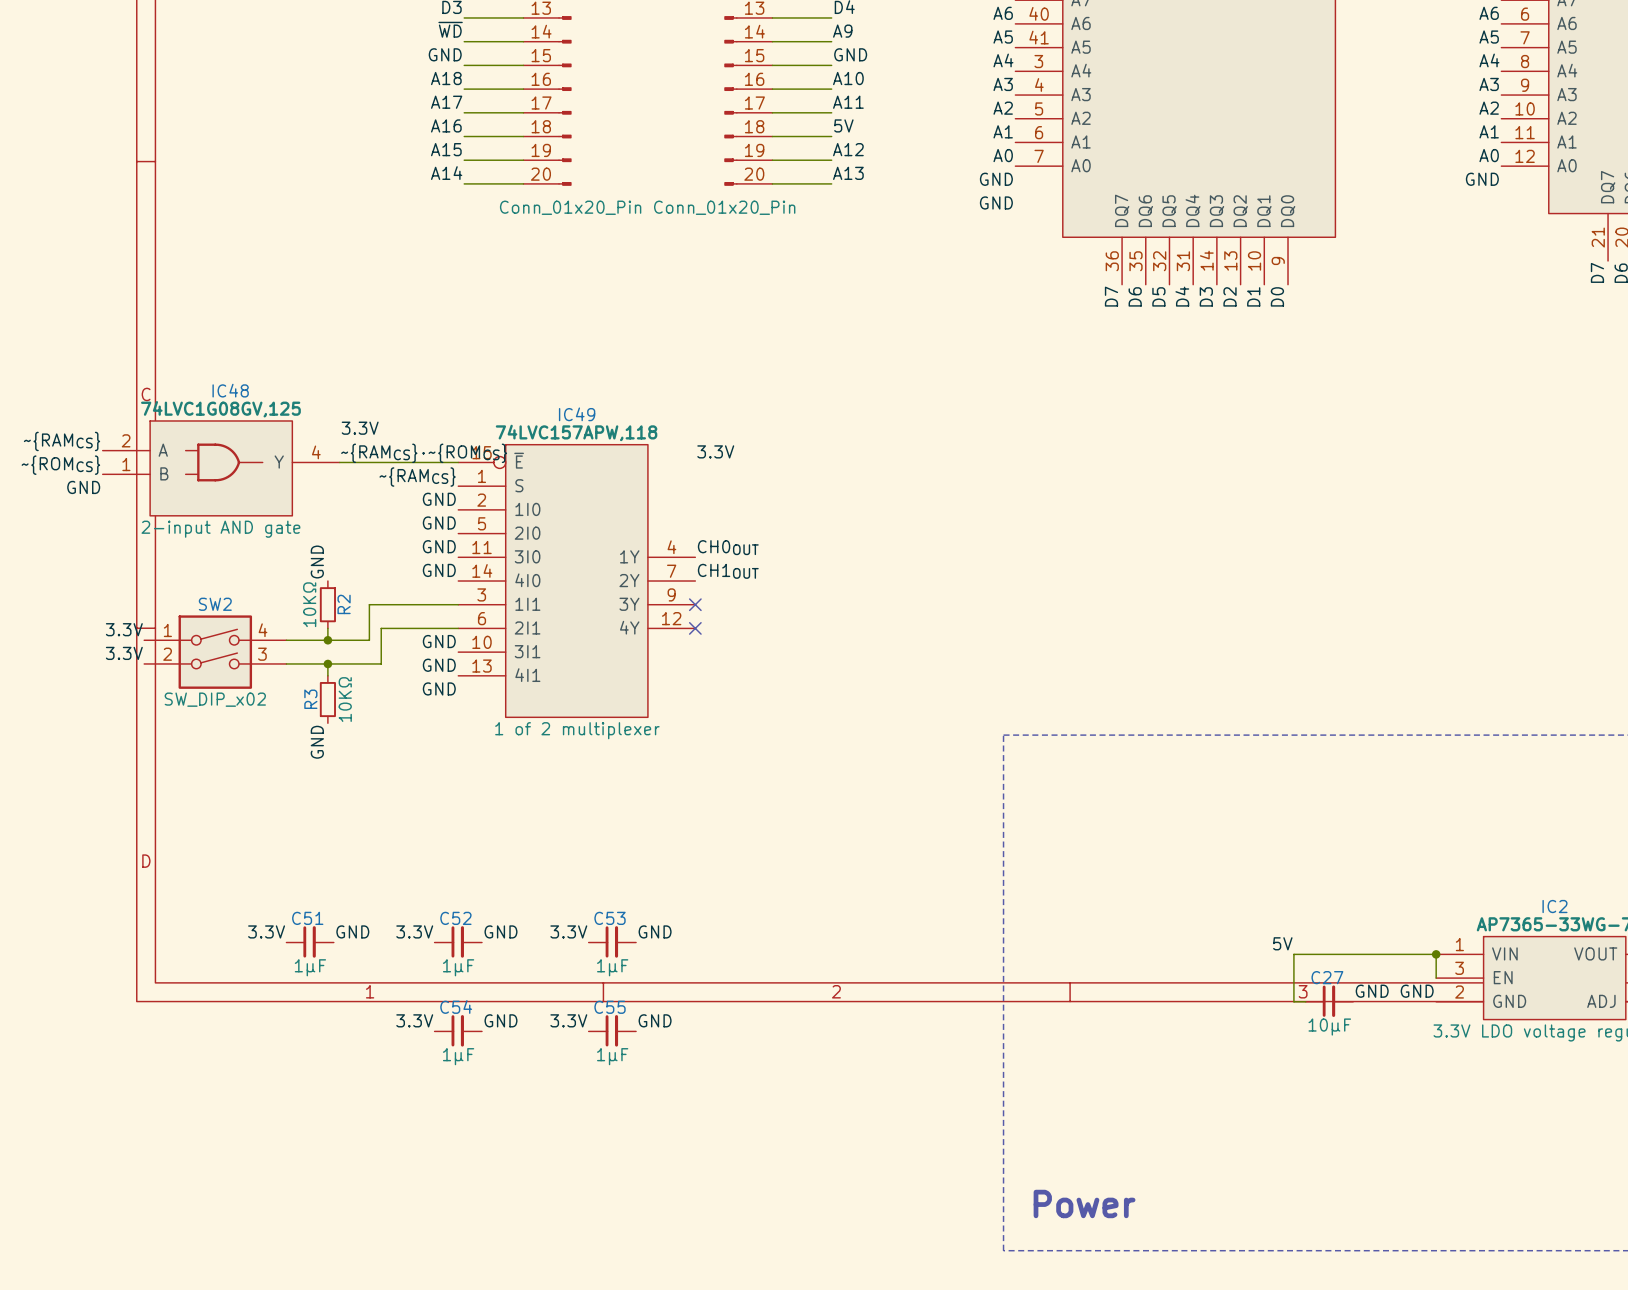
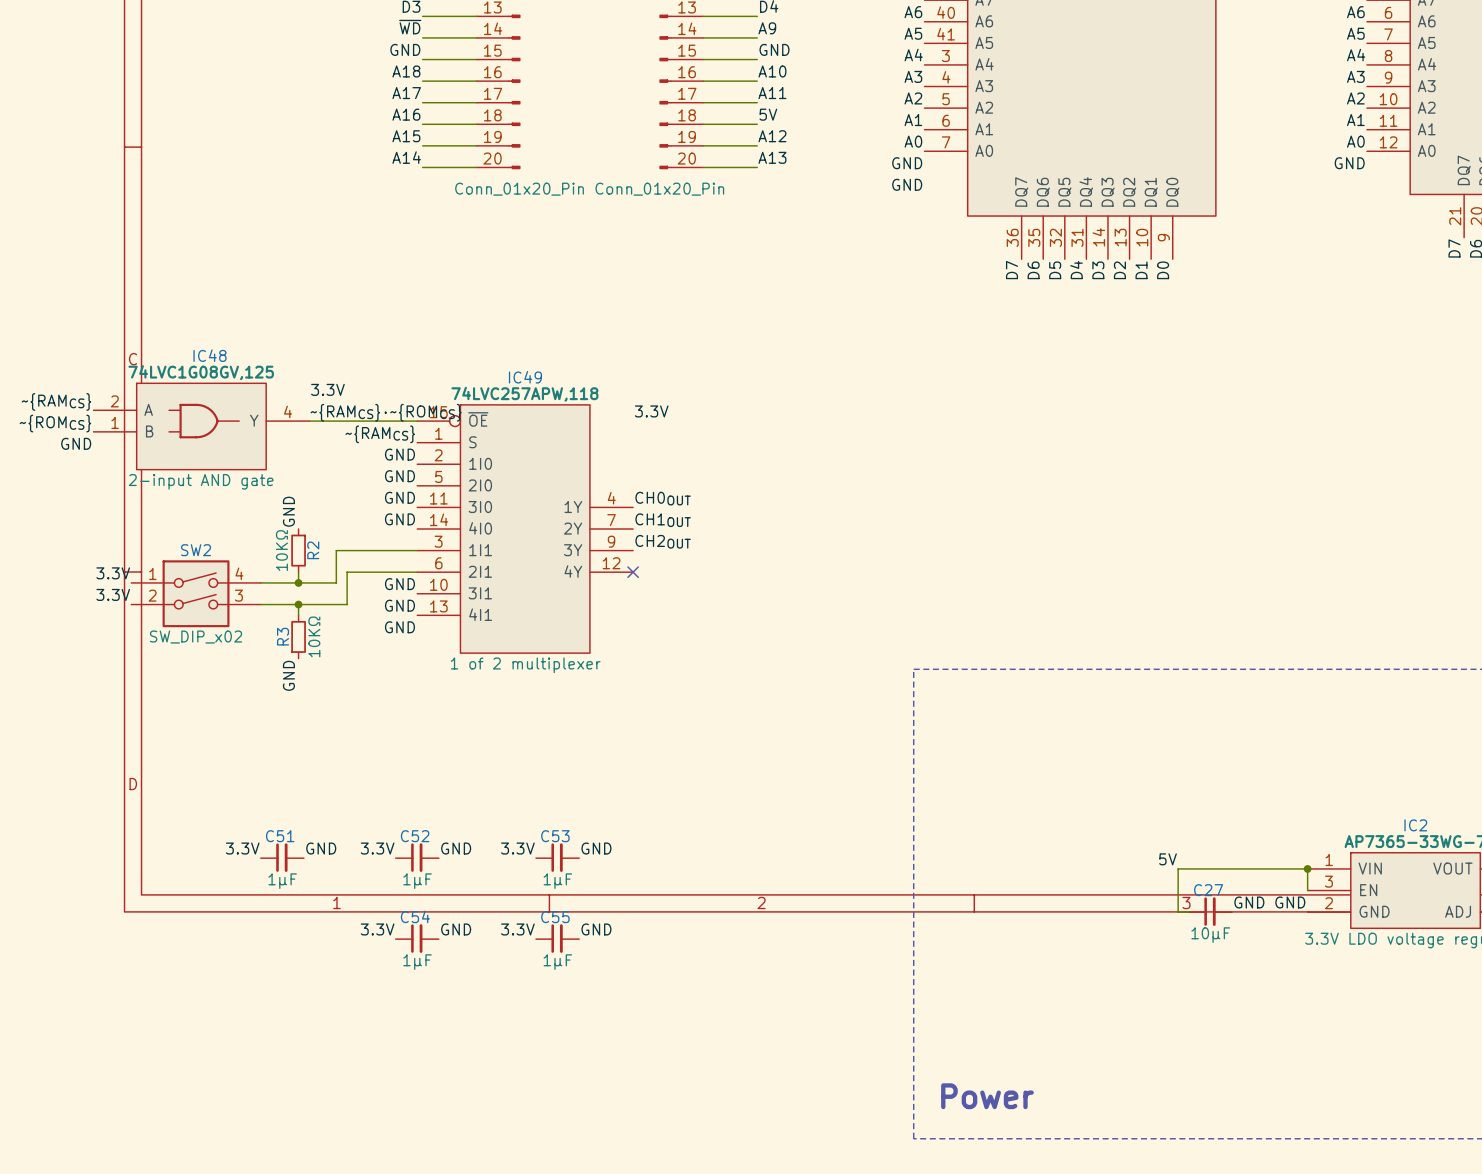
IC49 value: 74LVC157APW,118 (576, 432) -> 74LVC257APW,118 (524, 394)
IC49 pin name: ~{E} (519, 460) -> ~{OE} (478, 419)
label: none -> CH2OUT (663, 541)
no-connect mark: (695, 604) -> none

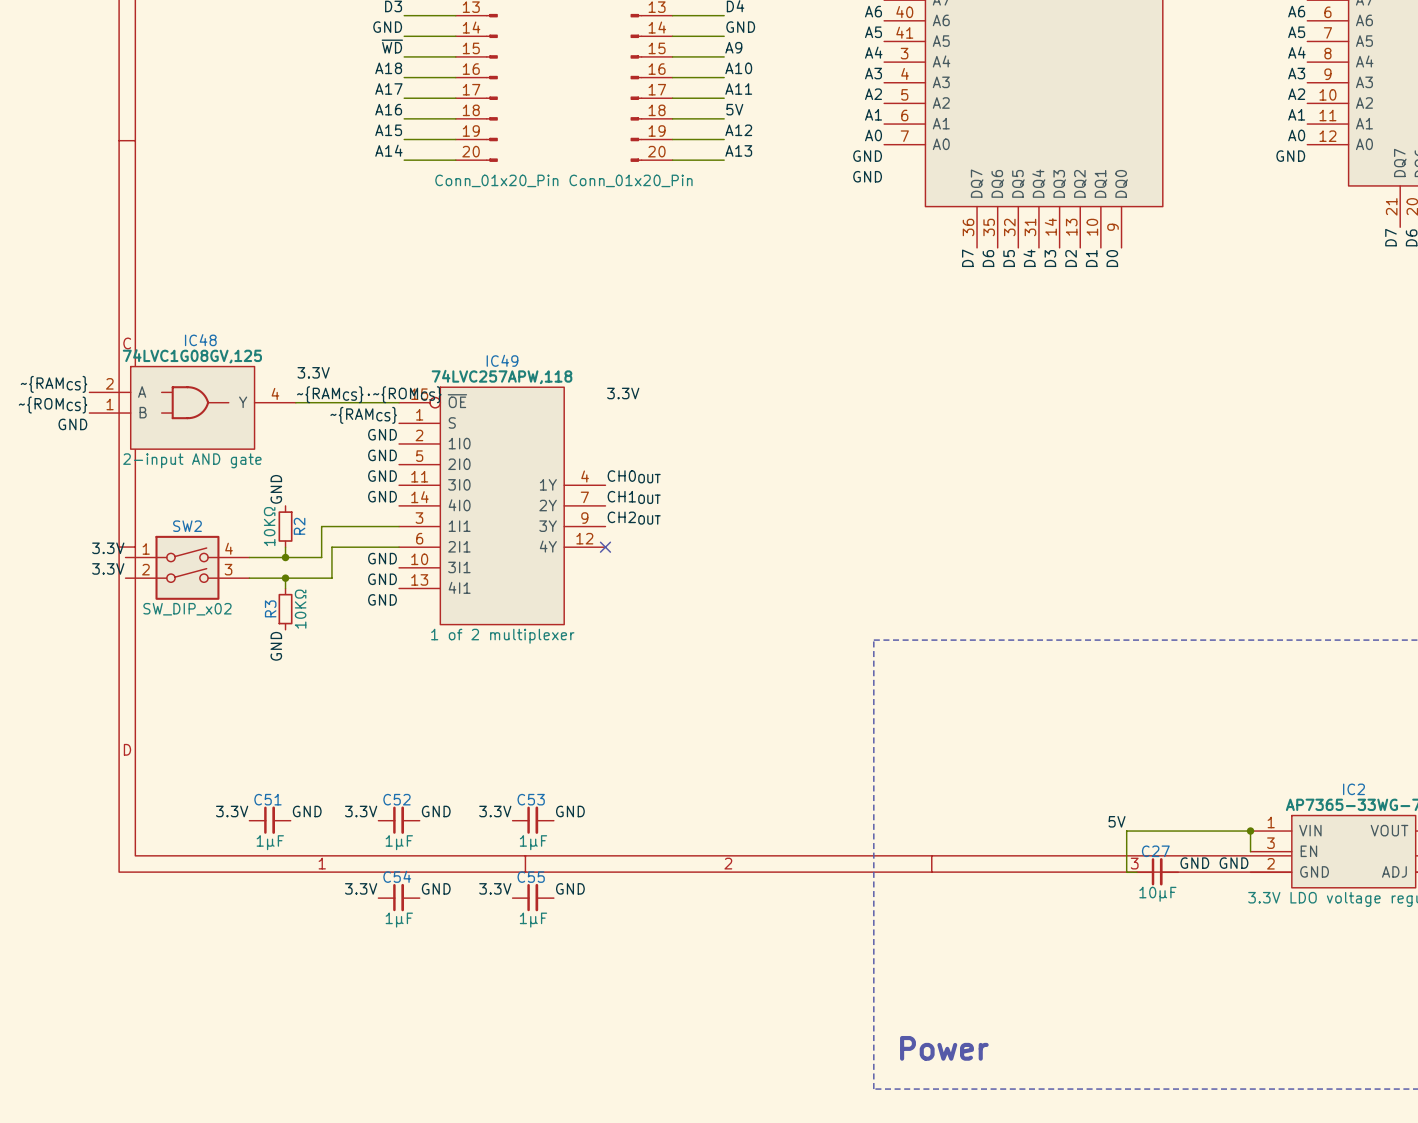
label: ~{WD} (410, 27) -> GND (387, 27)
label: A9 (767, 28) -> GND (740, 27)
label: GND (405, 49) -> ~{WD} (392, 46)
label: GND (774, 49) -> A9 (733, 47)

